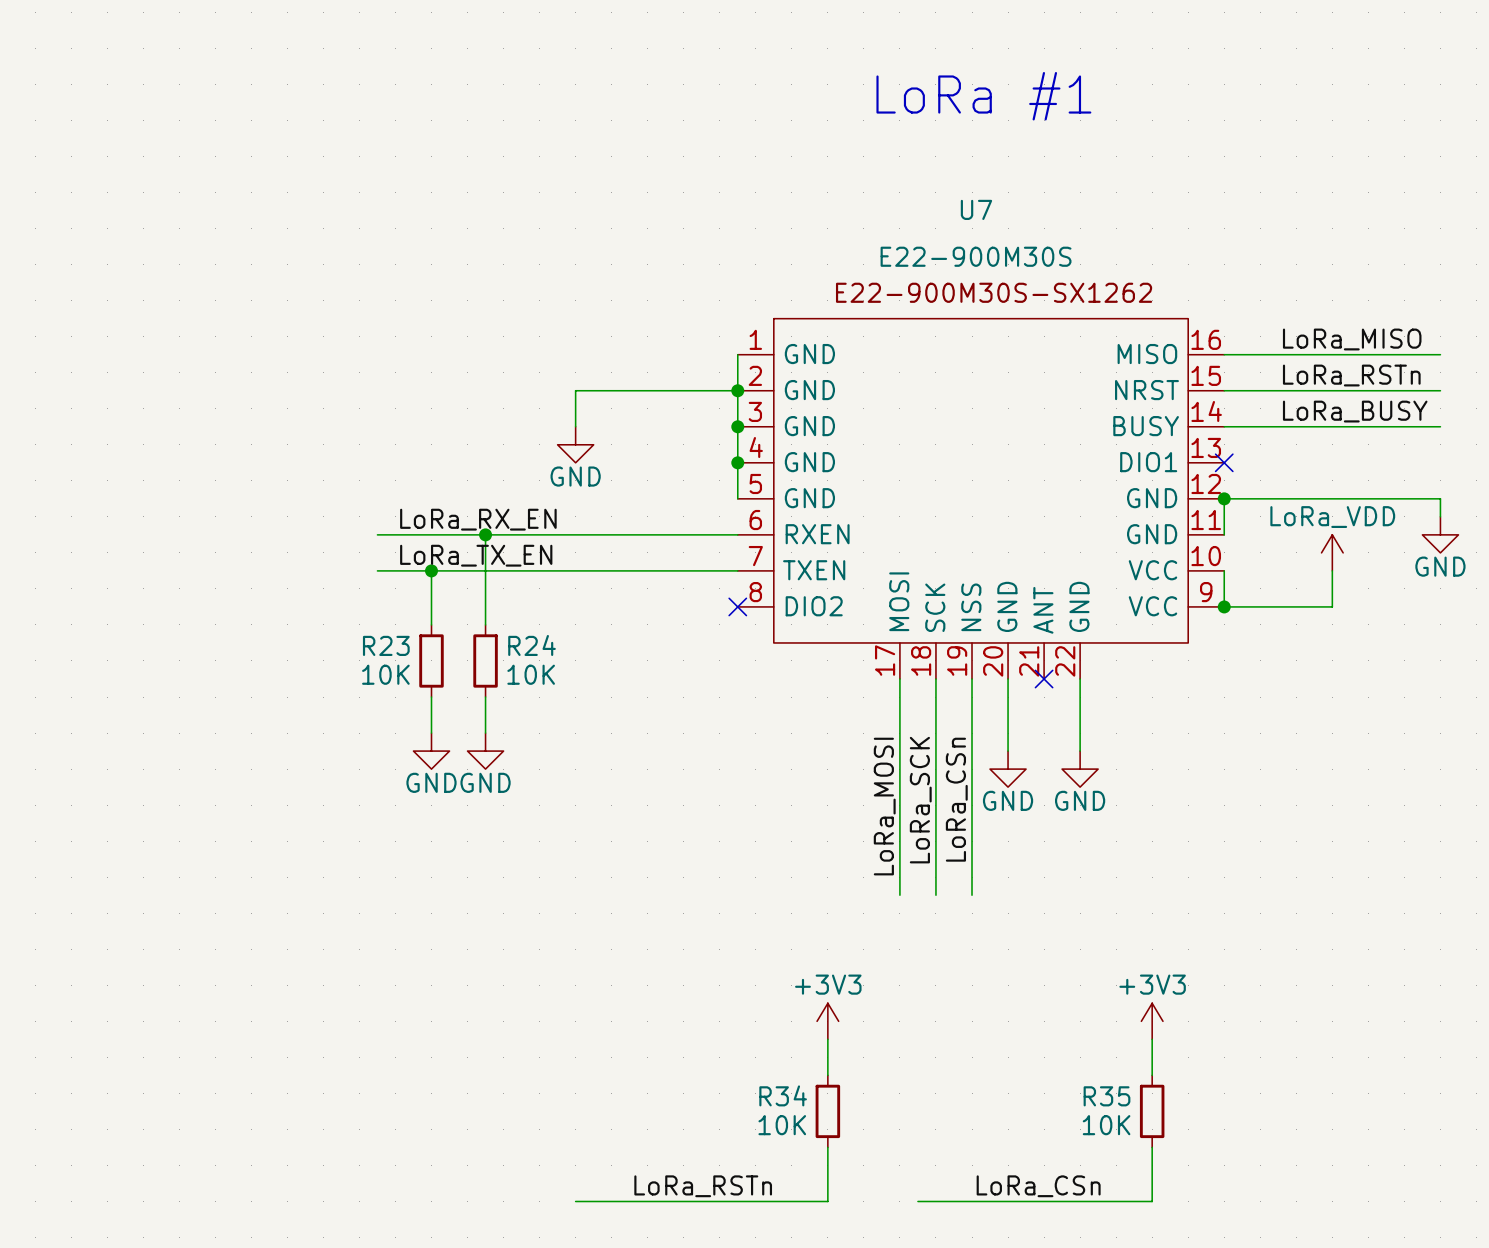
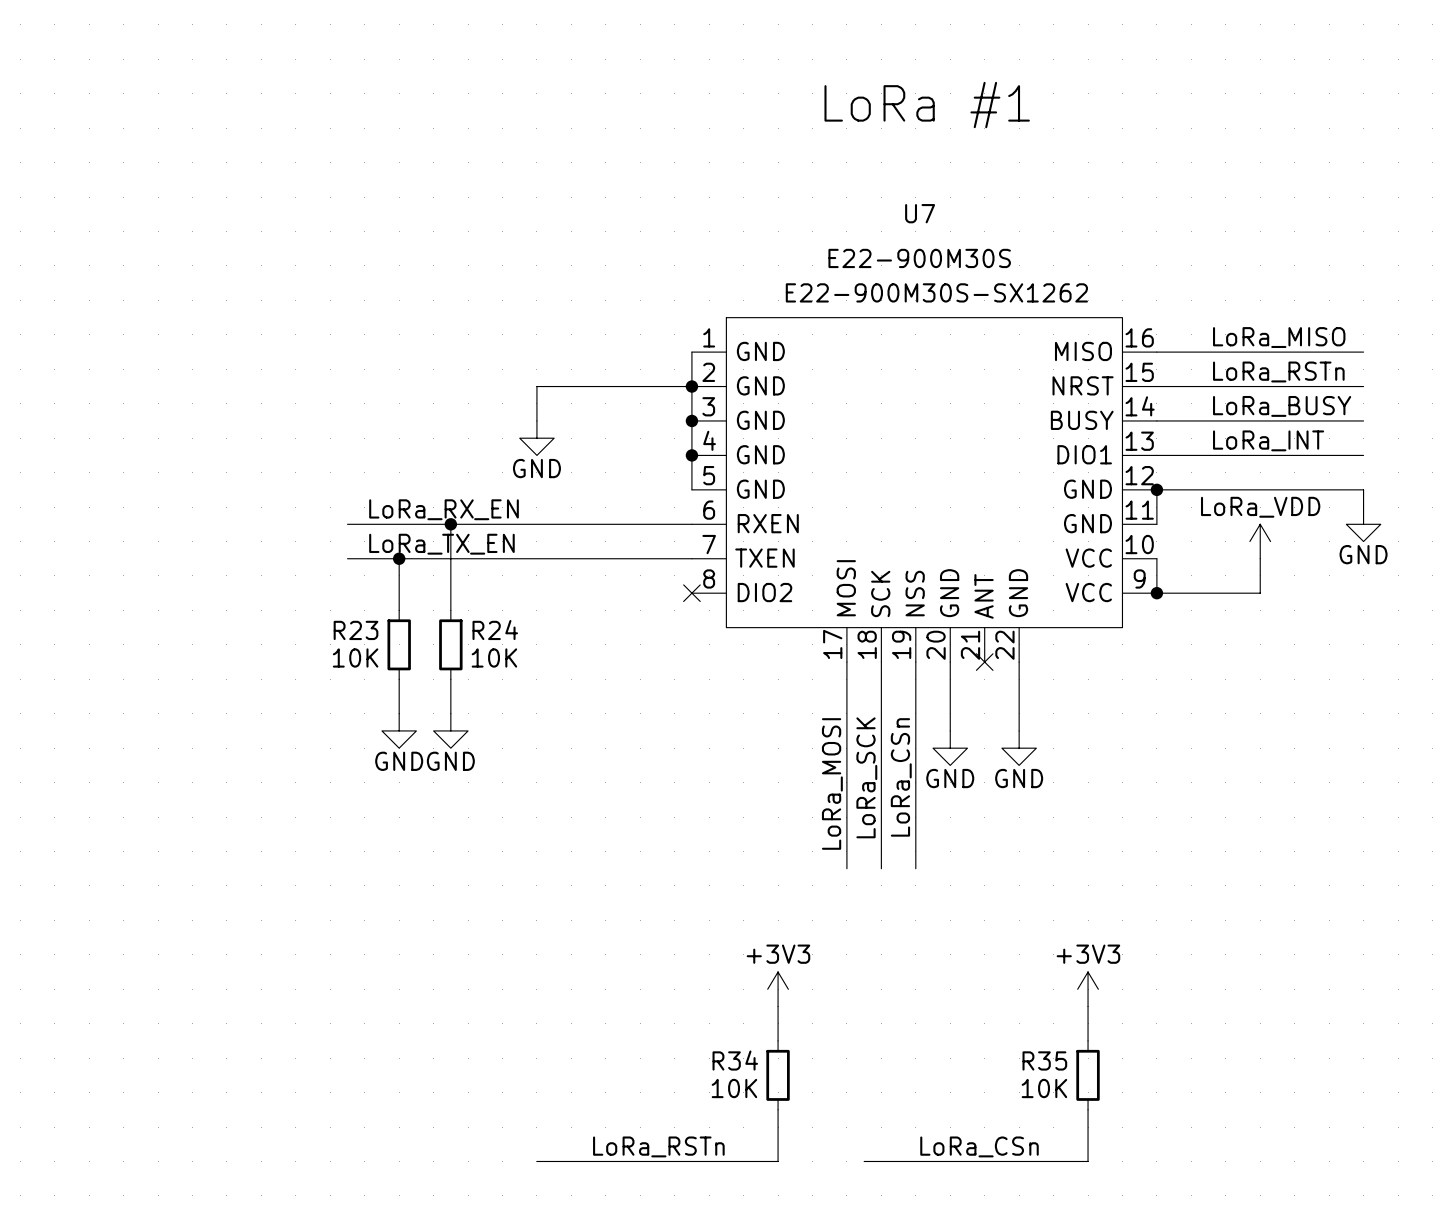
label: none -> LoRa_INT (1268, 440)
wire: none -> (1156, 455) (1363, 455)
no-connect mark: (1224, 462) -> none

